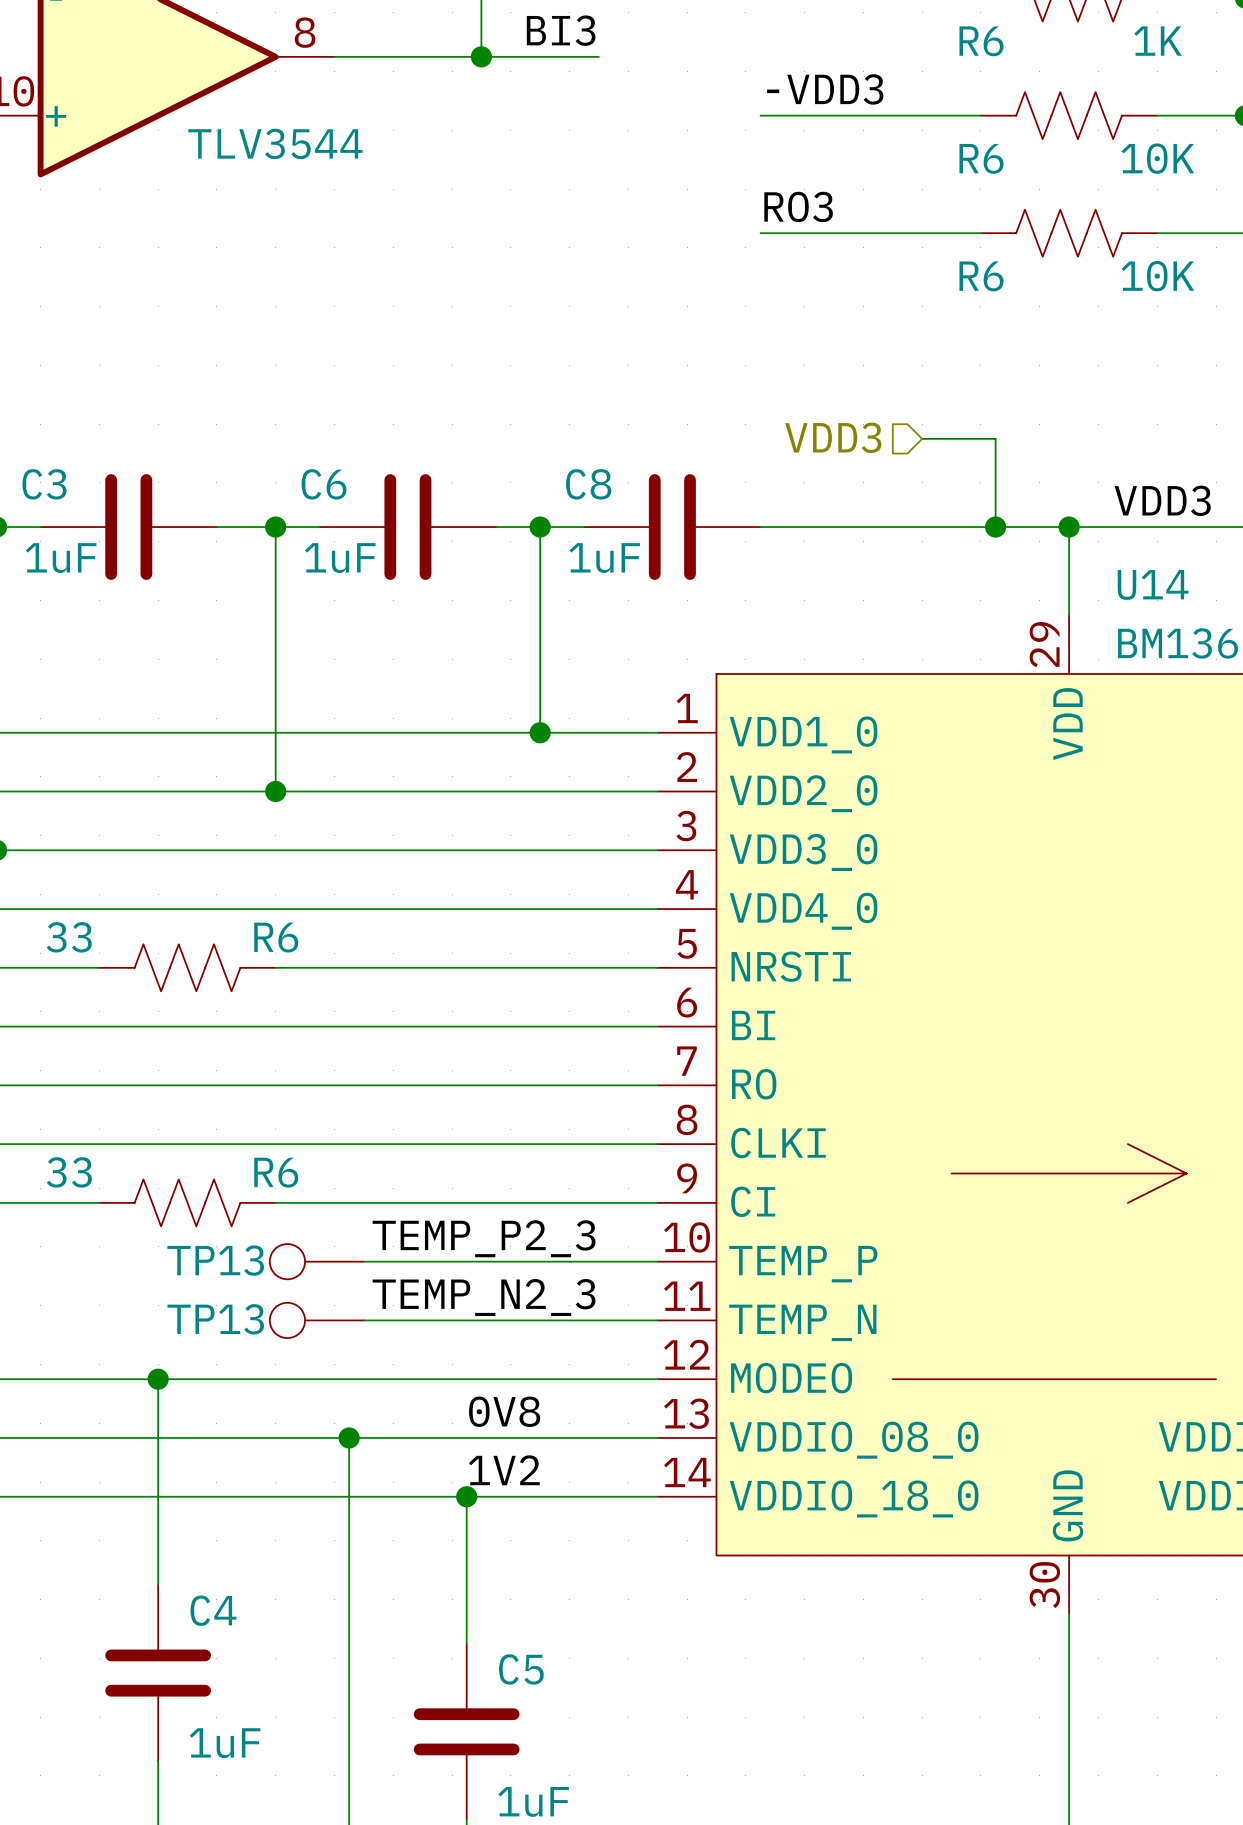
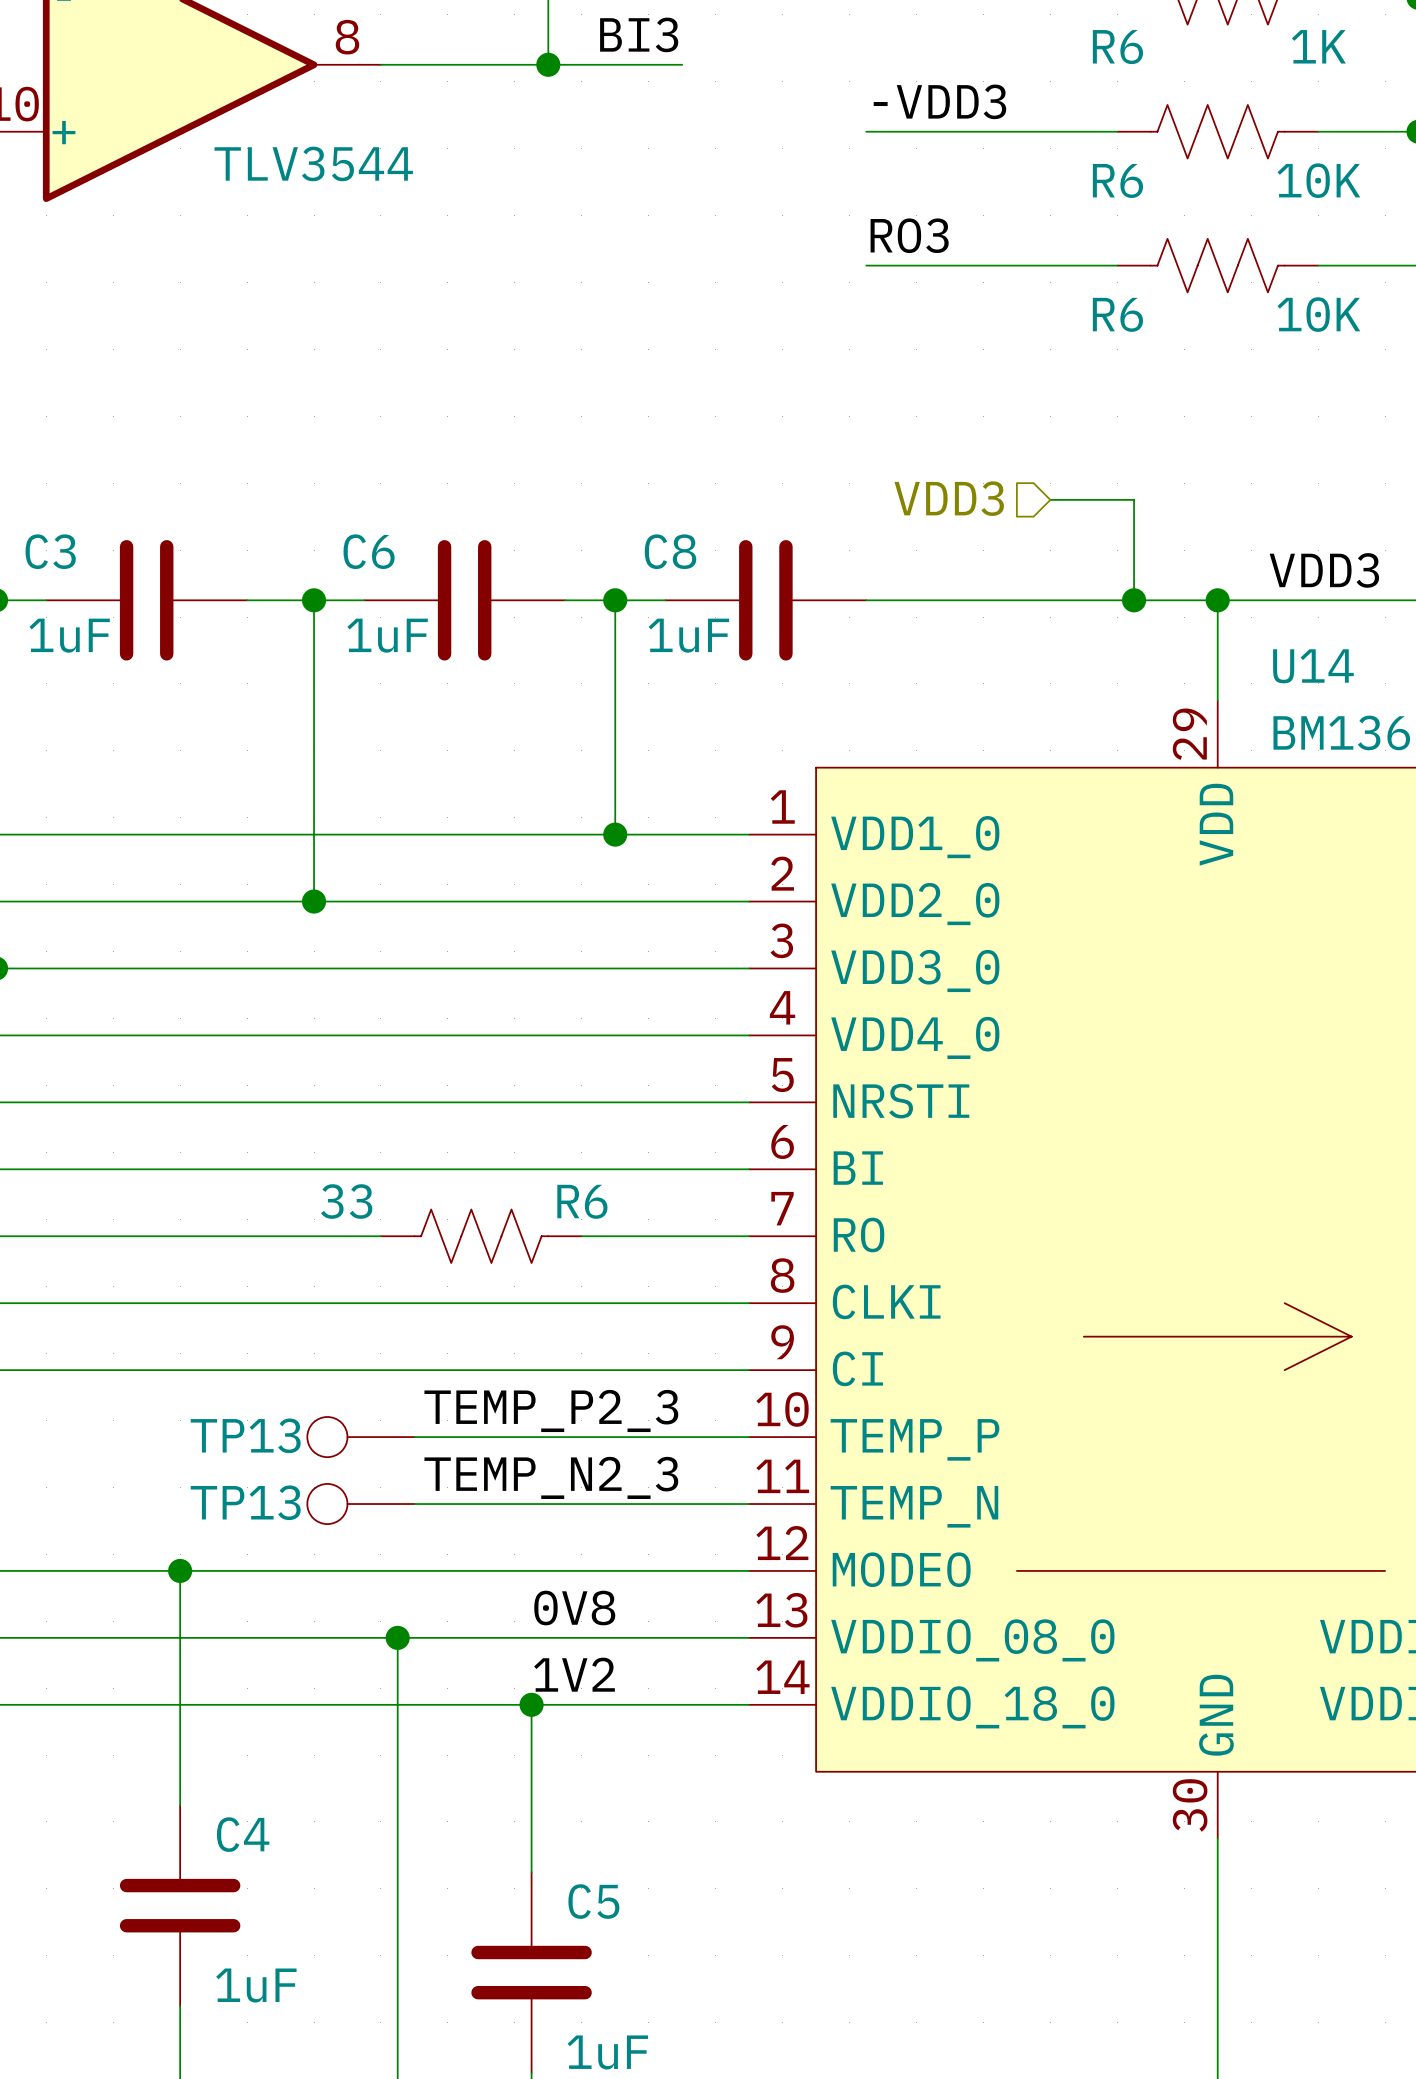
R6: 33 (187, 967) -> none
wire: (334, 1085) (510, 1085) -> (113, 1102) (314, 1102)
R6: none -> 33 (481, 1236)
wire: none -> (113, 1370) (314, 1370)
R6: 33 (187, 1202) -> none

